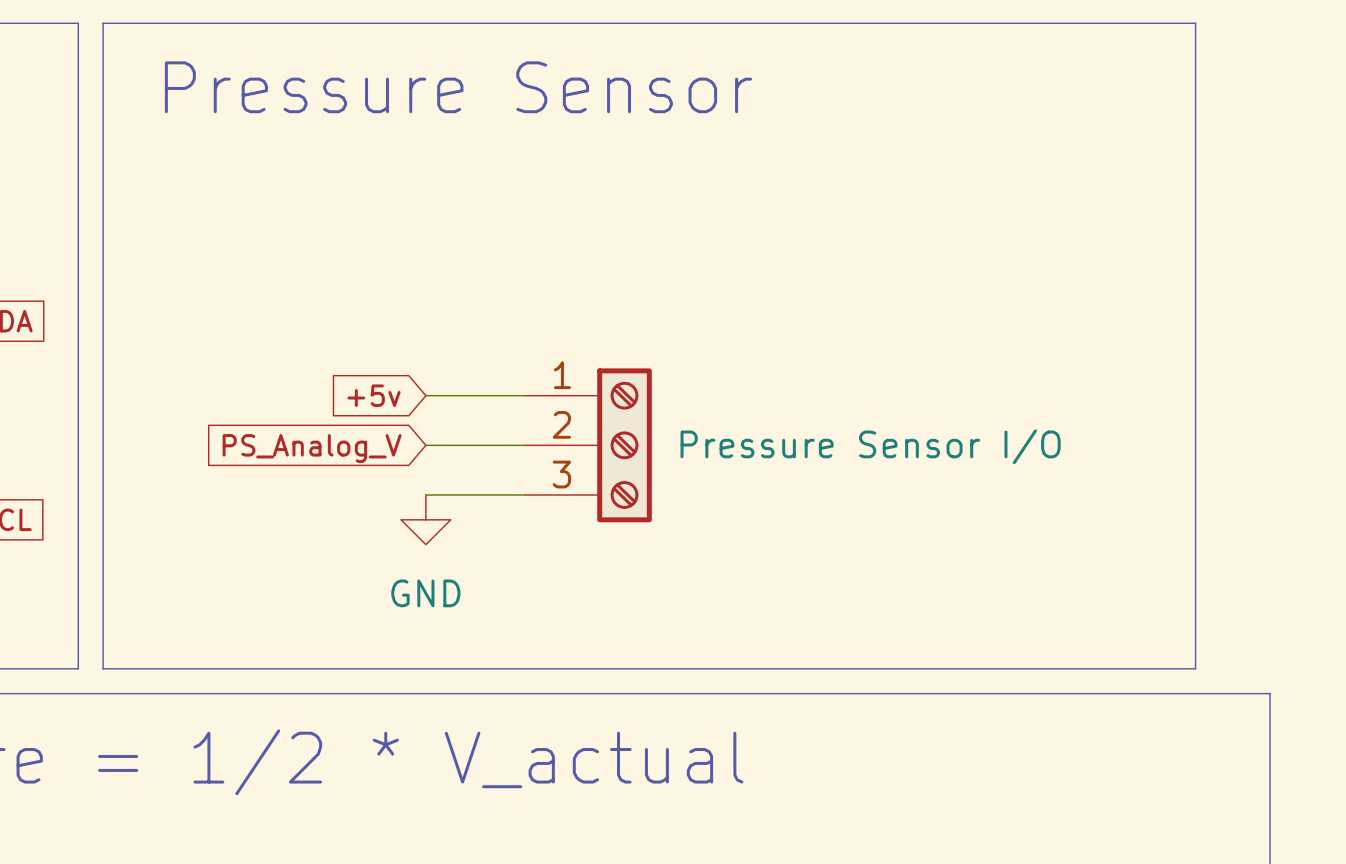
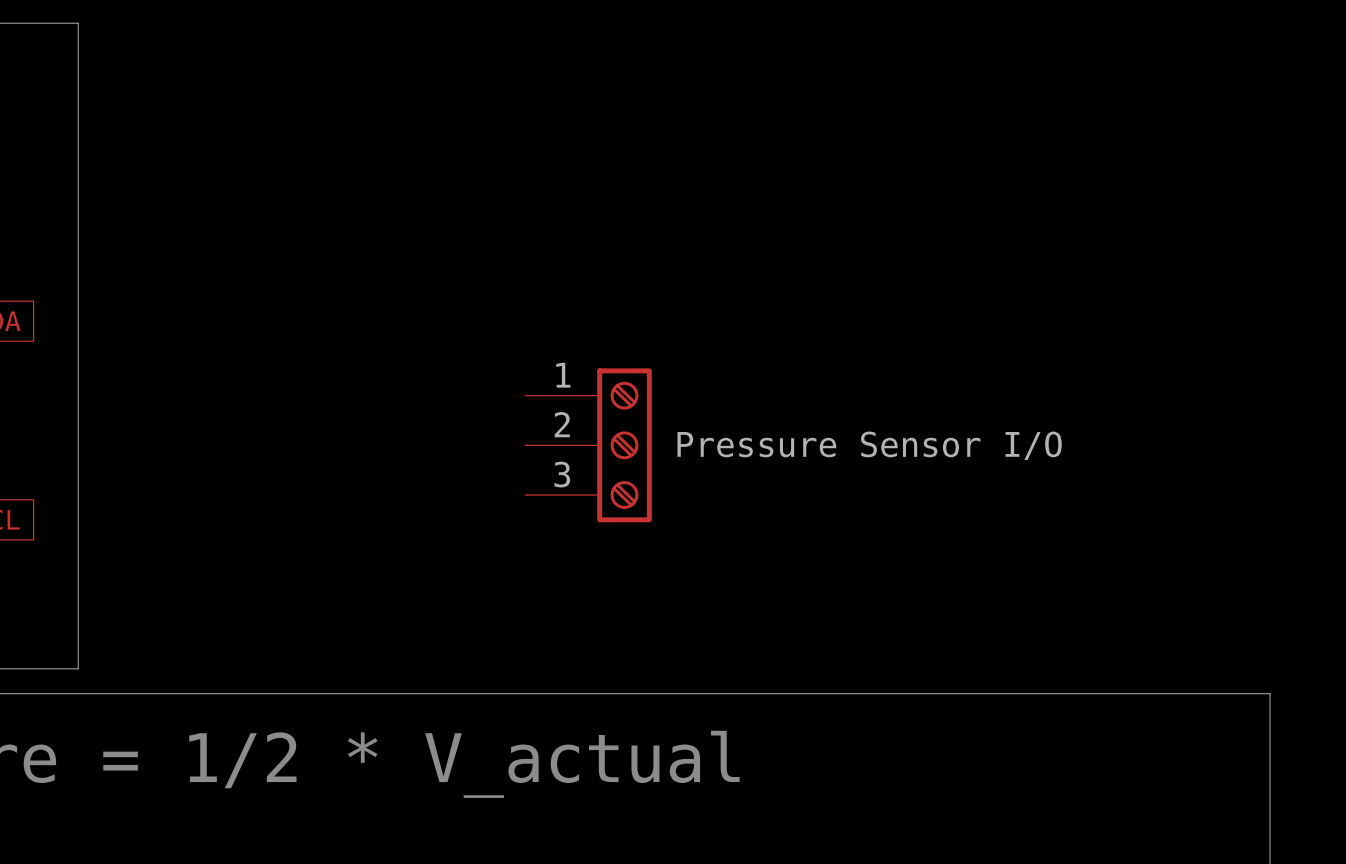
line: (103, 23) (1195, 23) (1195, 668) (103, 668) (103, 23) -> none
text: Pressure Sensor (458, 87) -> none
global label: +5v (374, 395) -> none
wire: (425, 395) (525, 395) -> none
wire: (425, 445) (525, 445) -> none
global label: PS_Analog_V (312, 448) -> none
wire: (425, 495) (525, 495) -> none
power symbol: GND (425, 519) -> none

